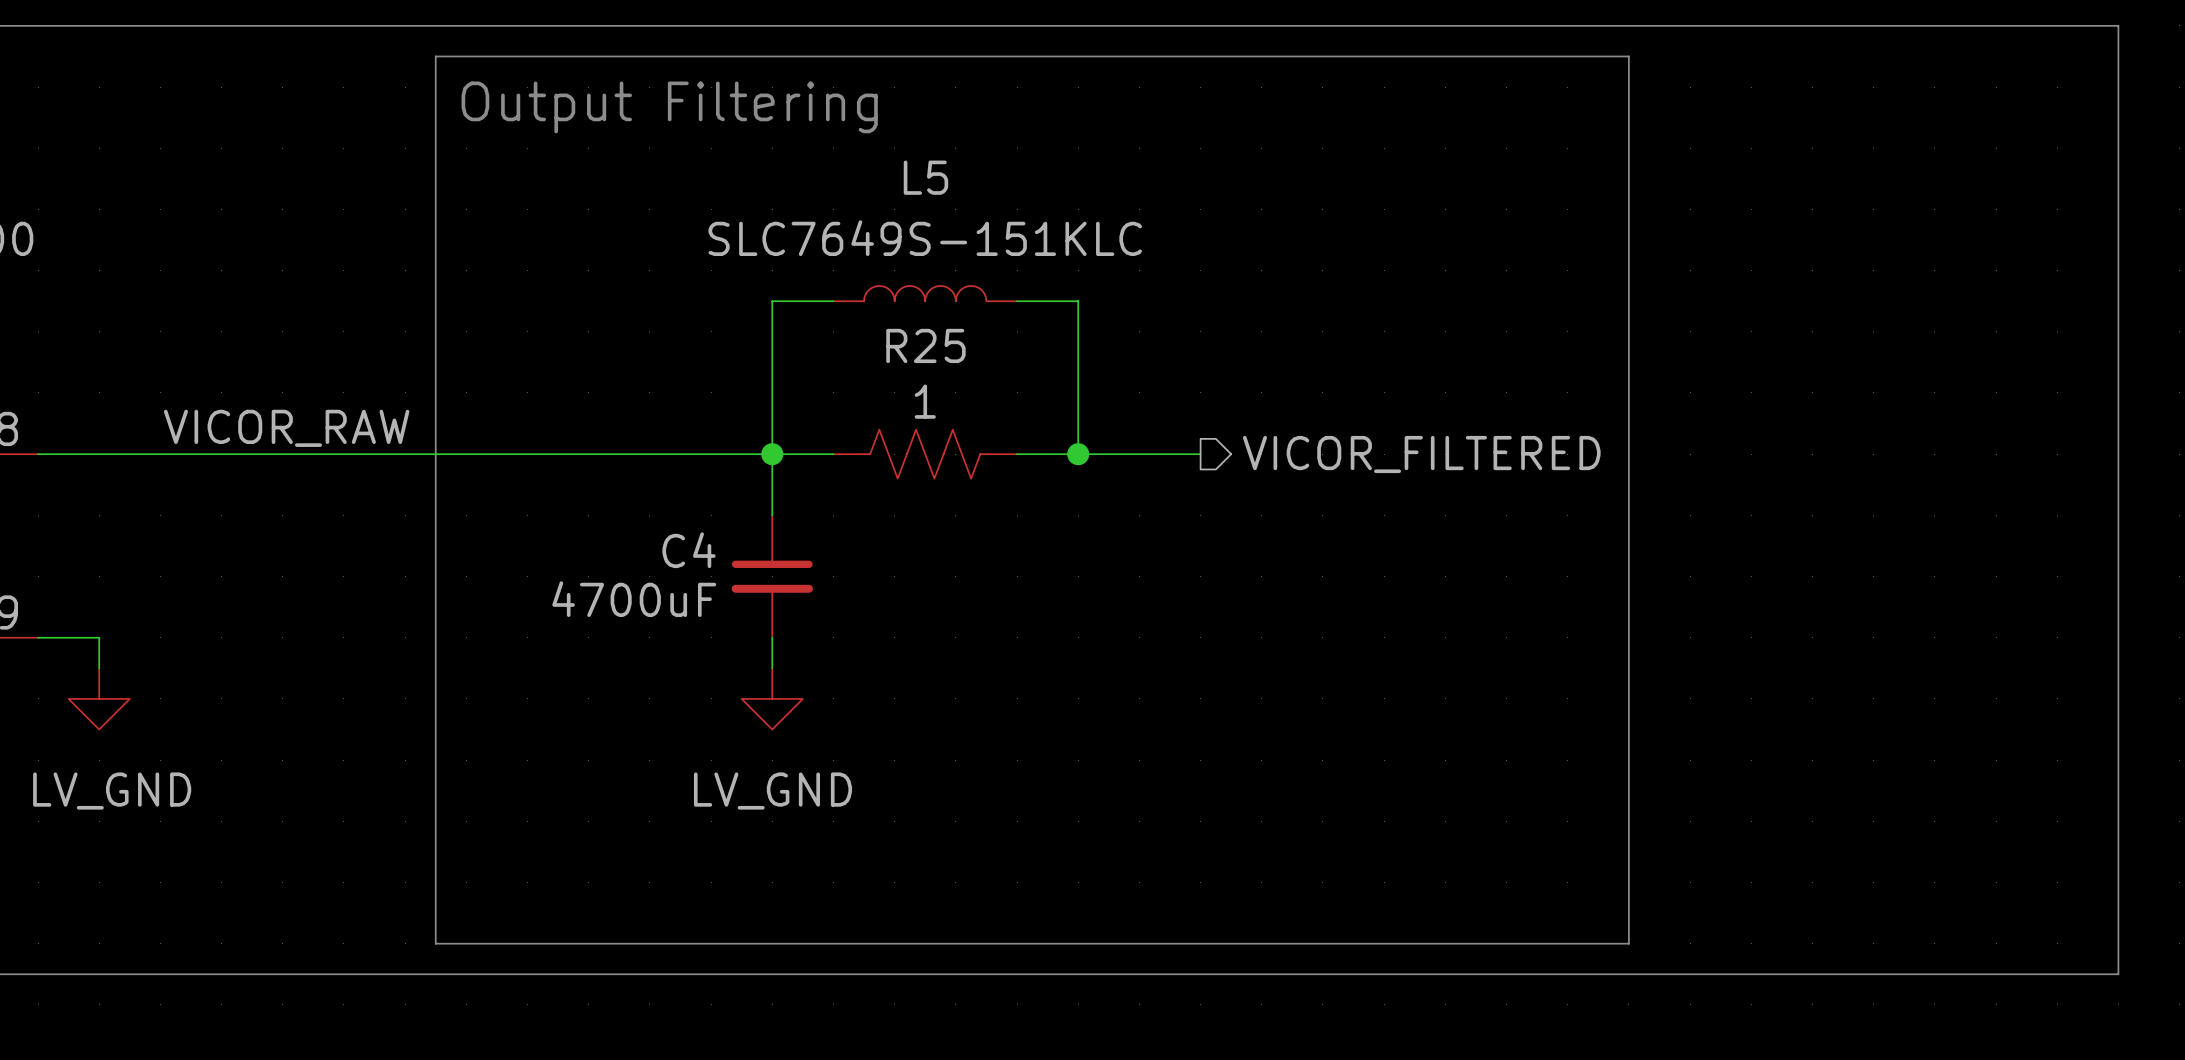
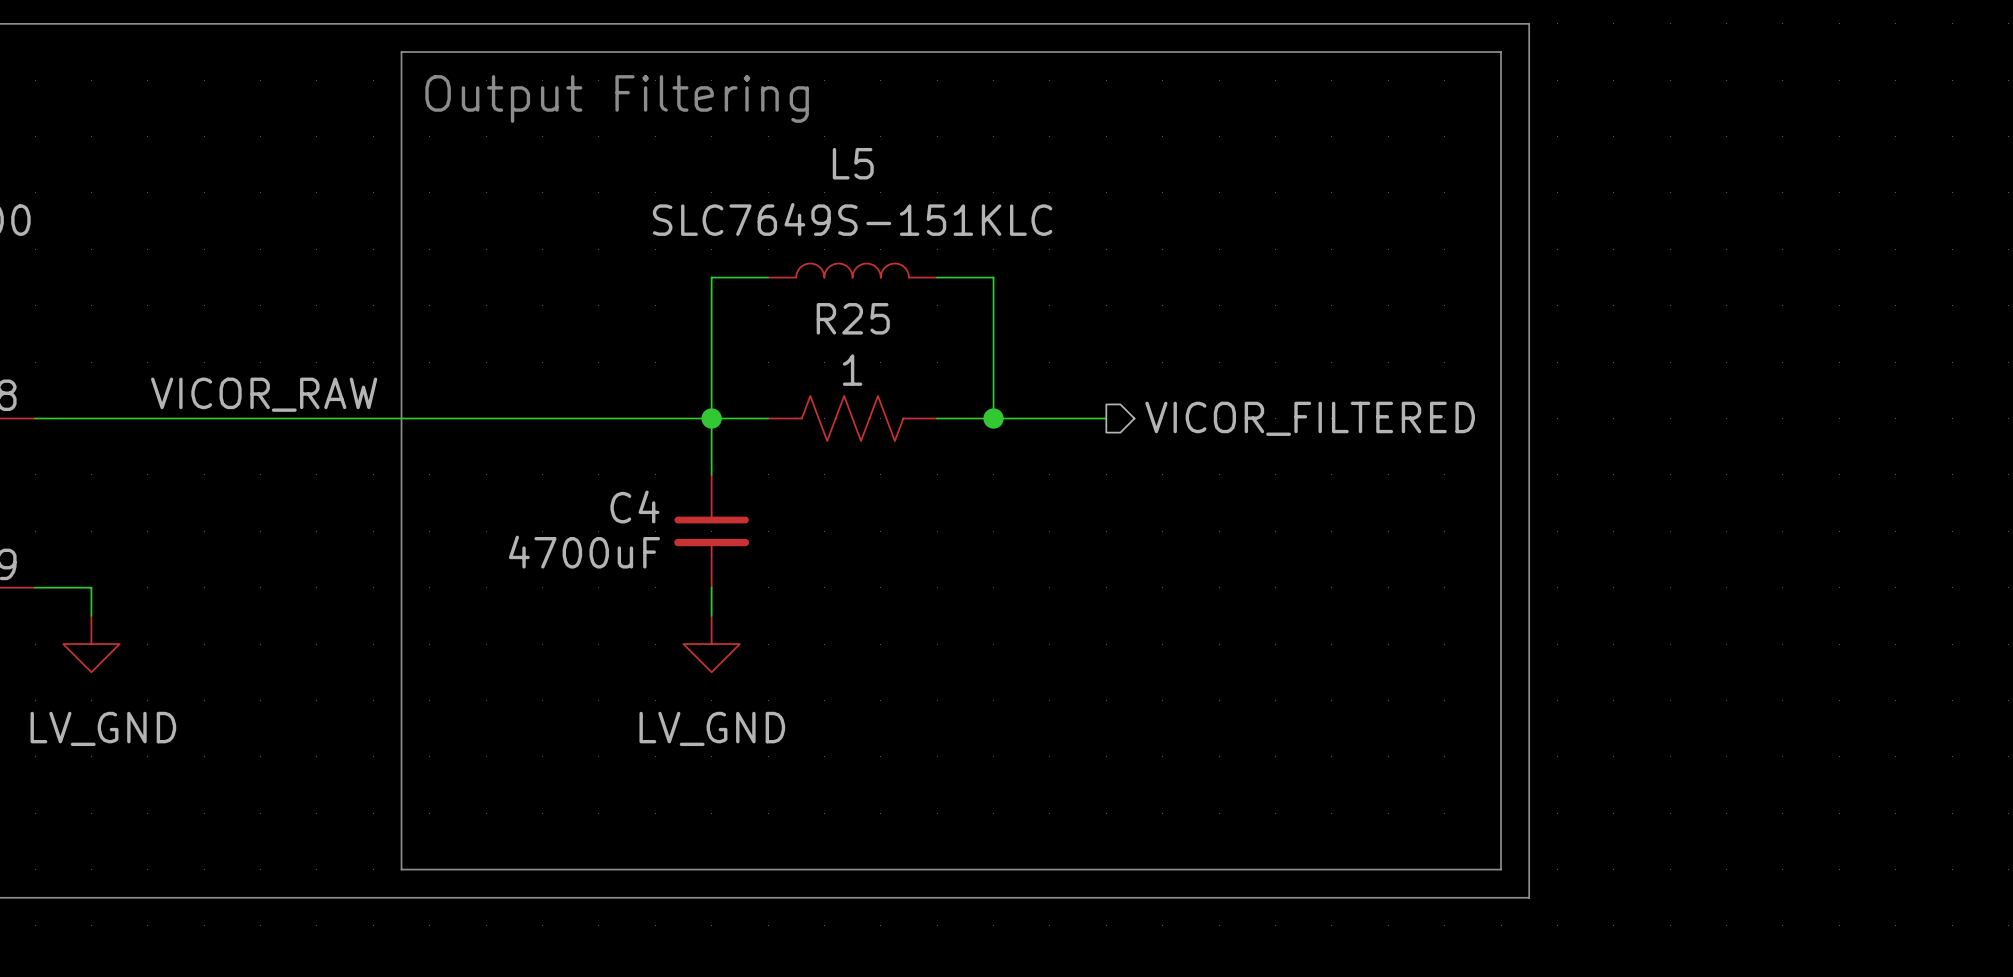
line: (1659, 25) (2118, 25) (2118, 974) (1659, 974) -> (1529, 23) (1529, 897)

